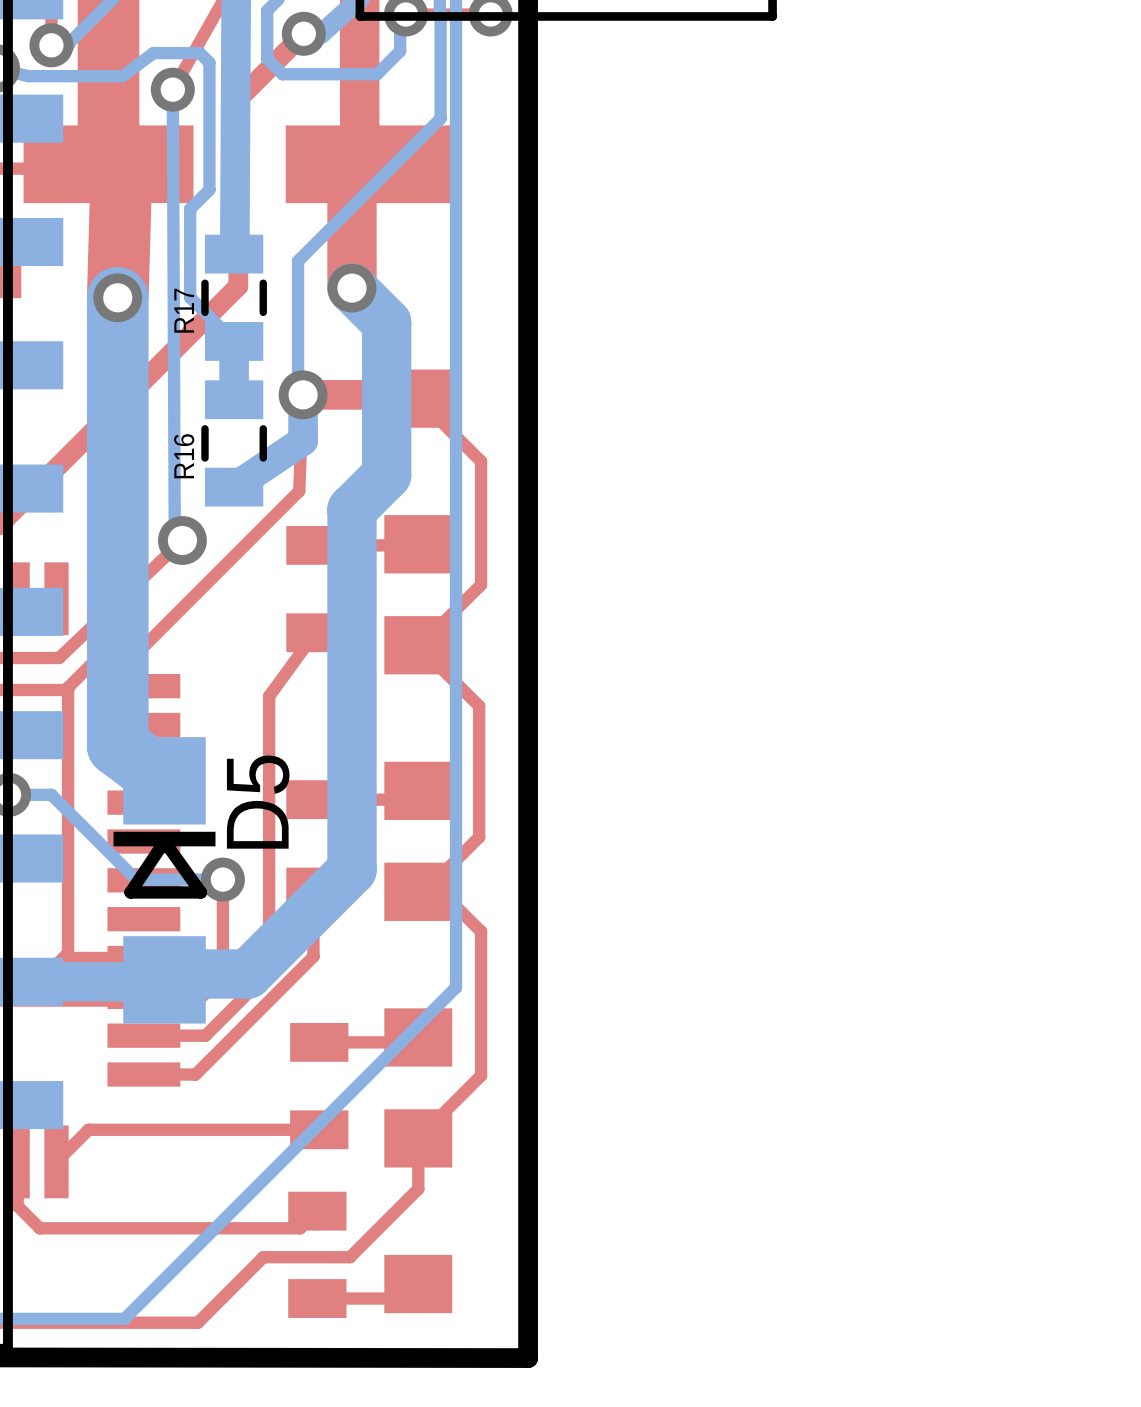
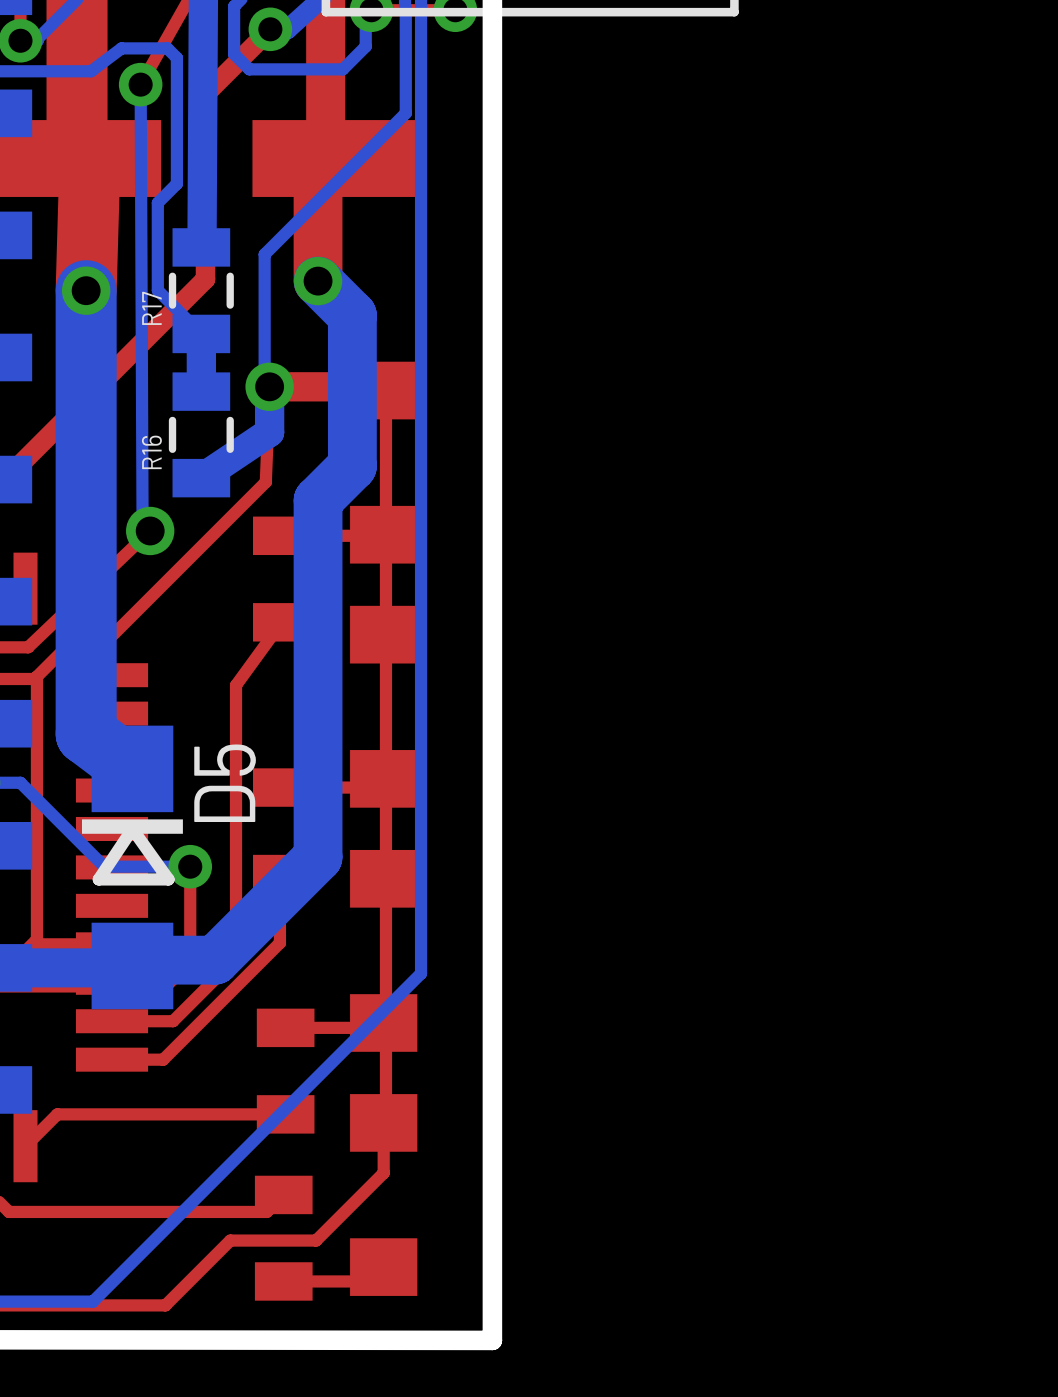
top track: (418, 398) (481, 461) (481, 584) (437, 627) (420, 627) -> (385, 377) (385, 617)
top track: (418, 645) (479, 706) (479, 837) (445, 870) (420, 870) -> none
top track: (418, 891) (441, 891) (481, 931) (481, 1075) (420, 1136) -> (385, 627) (385, 1120)

